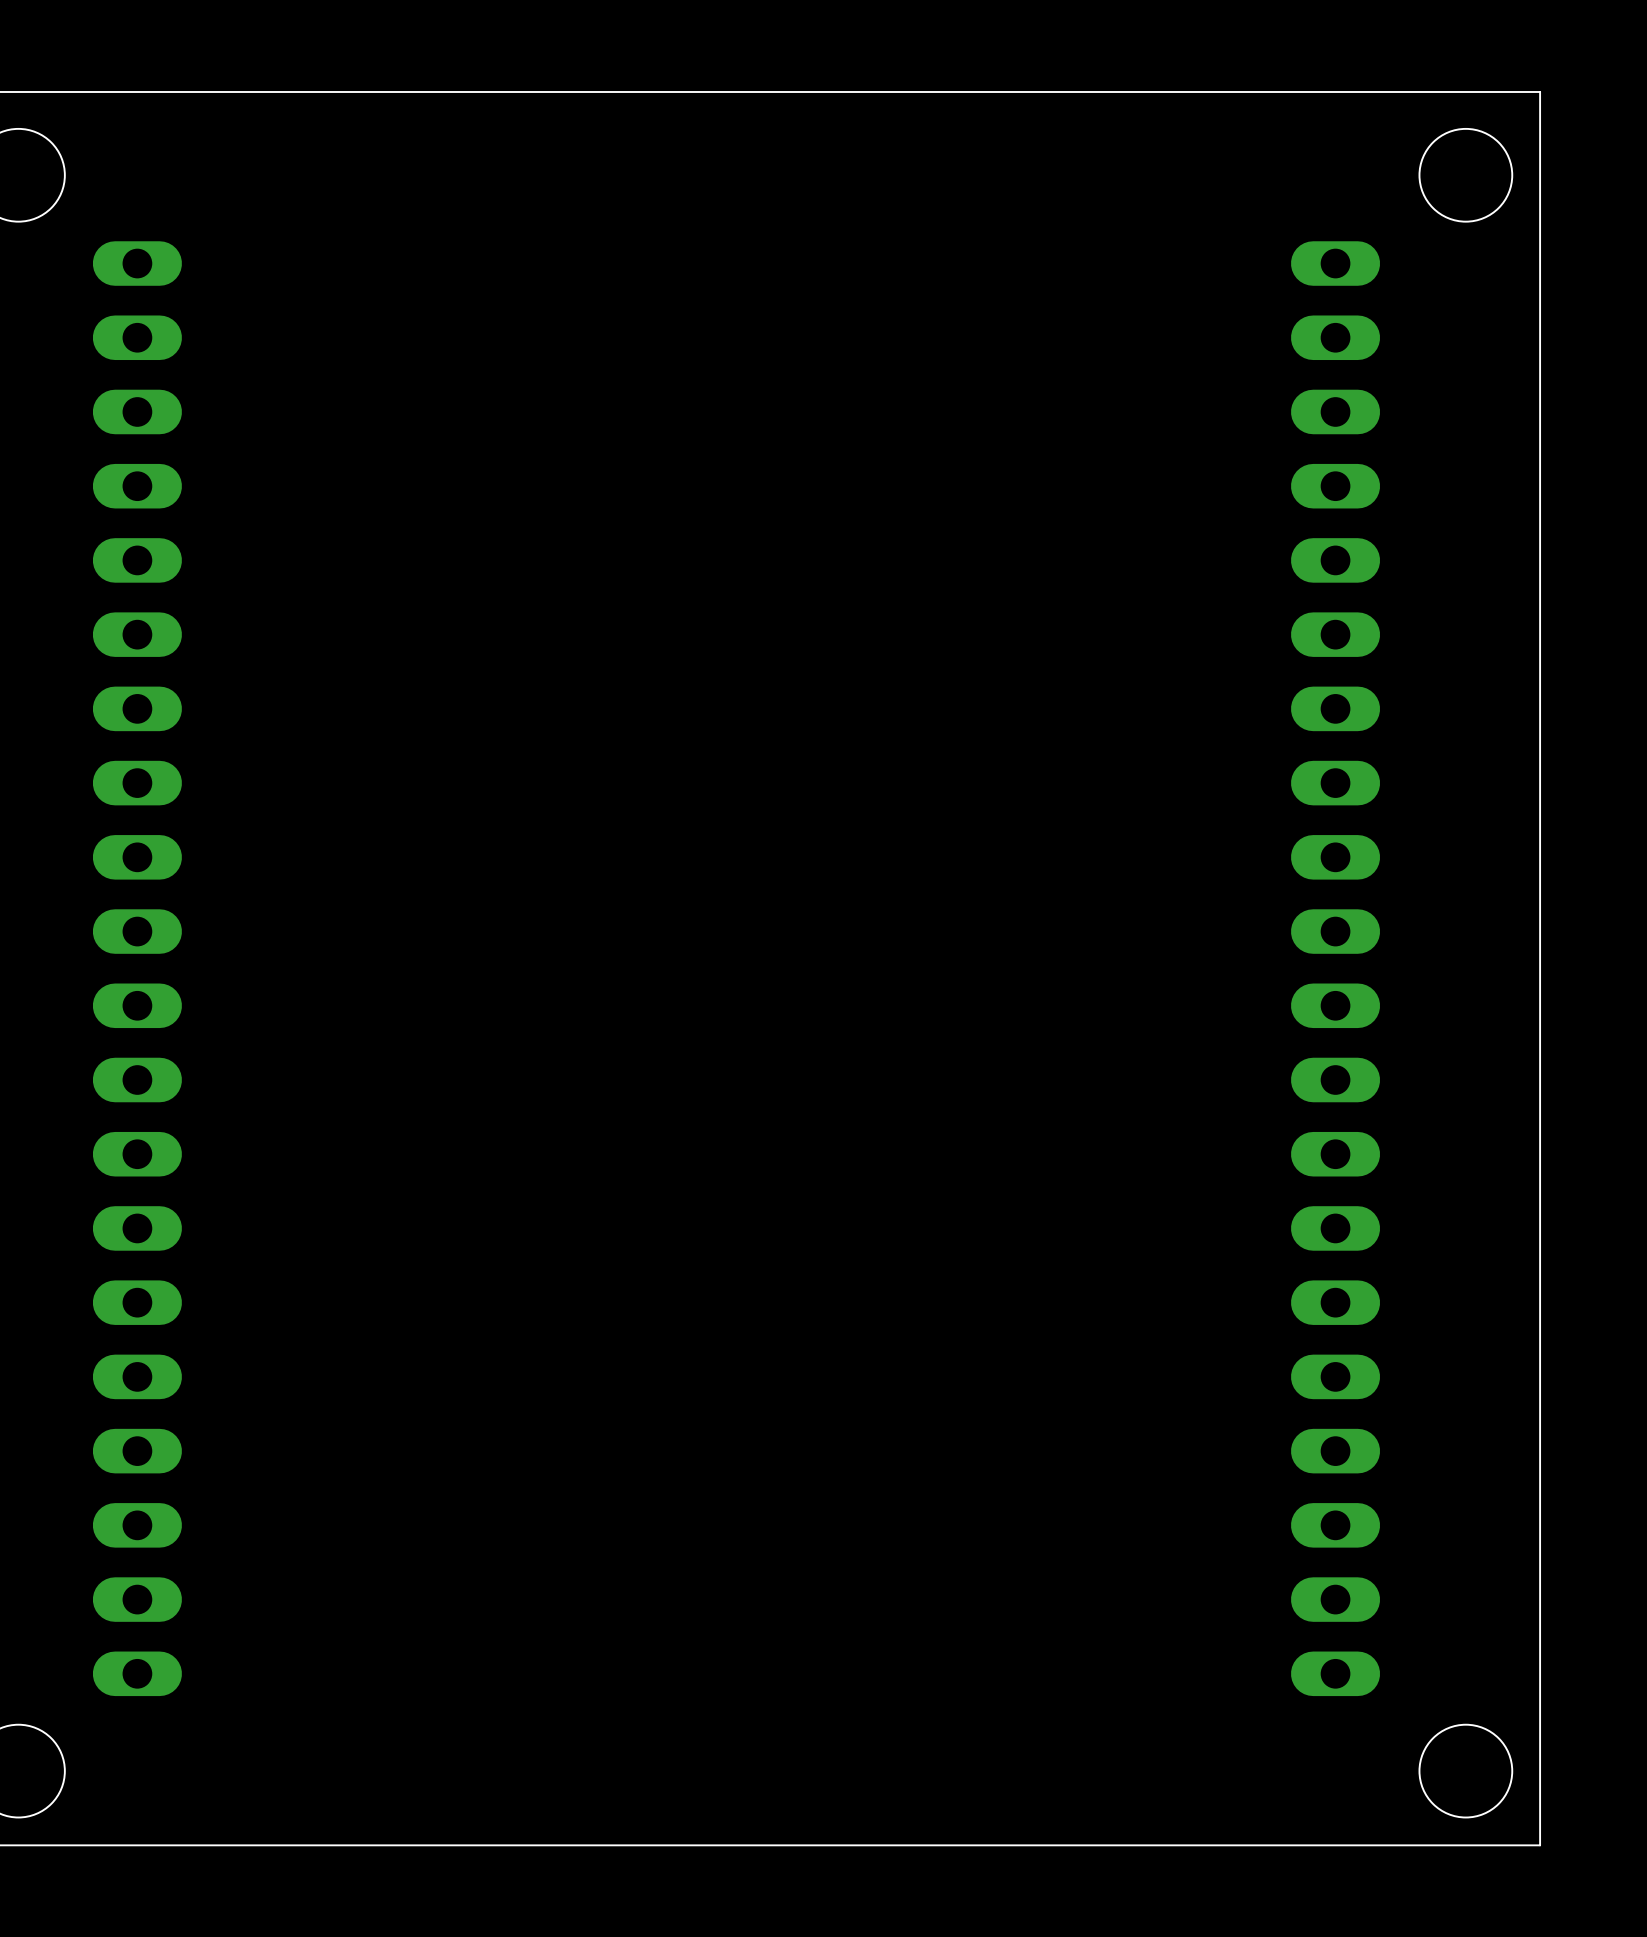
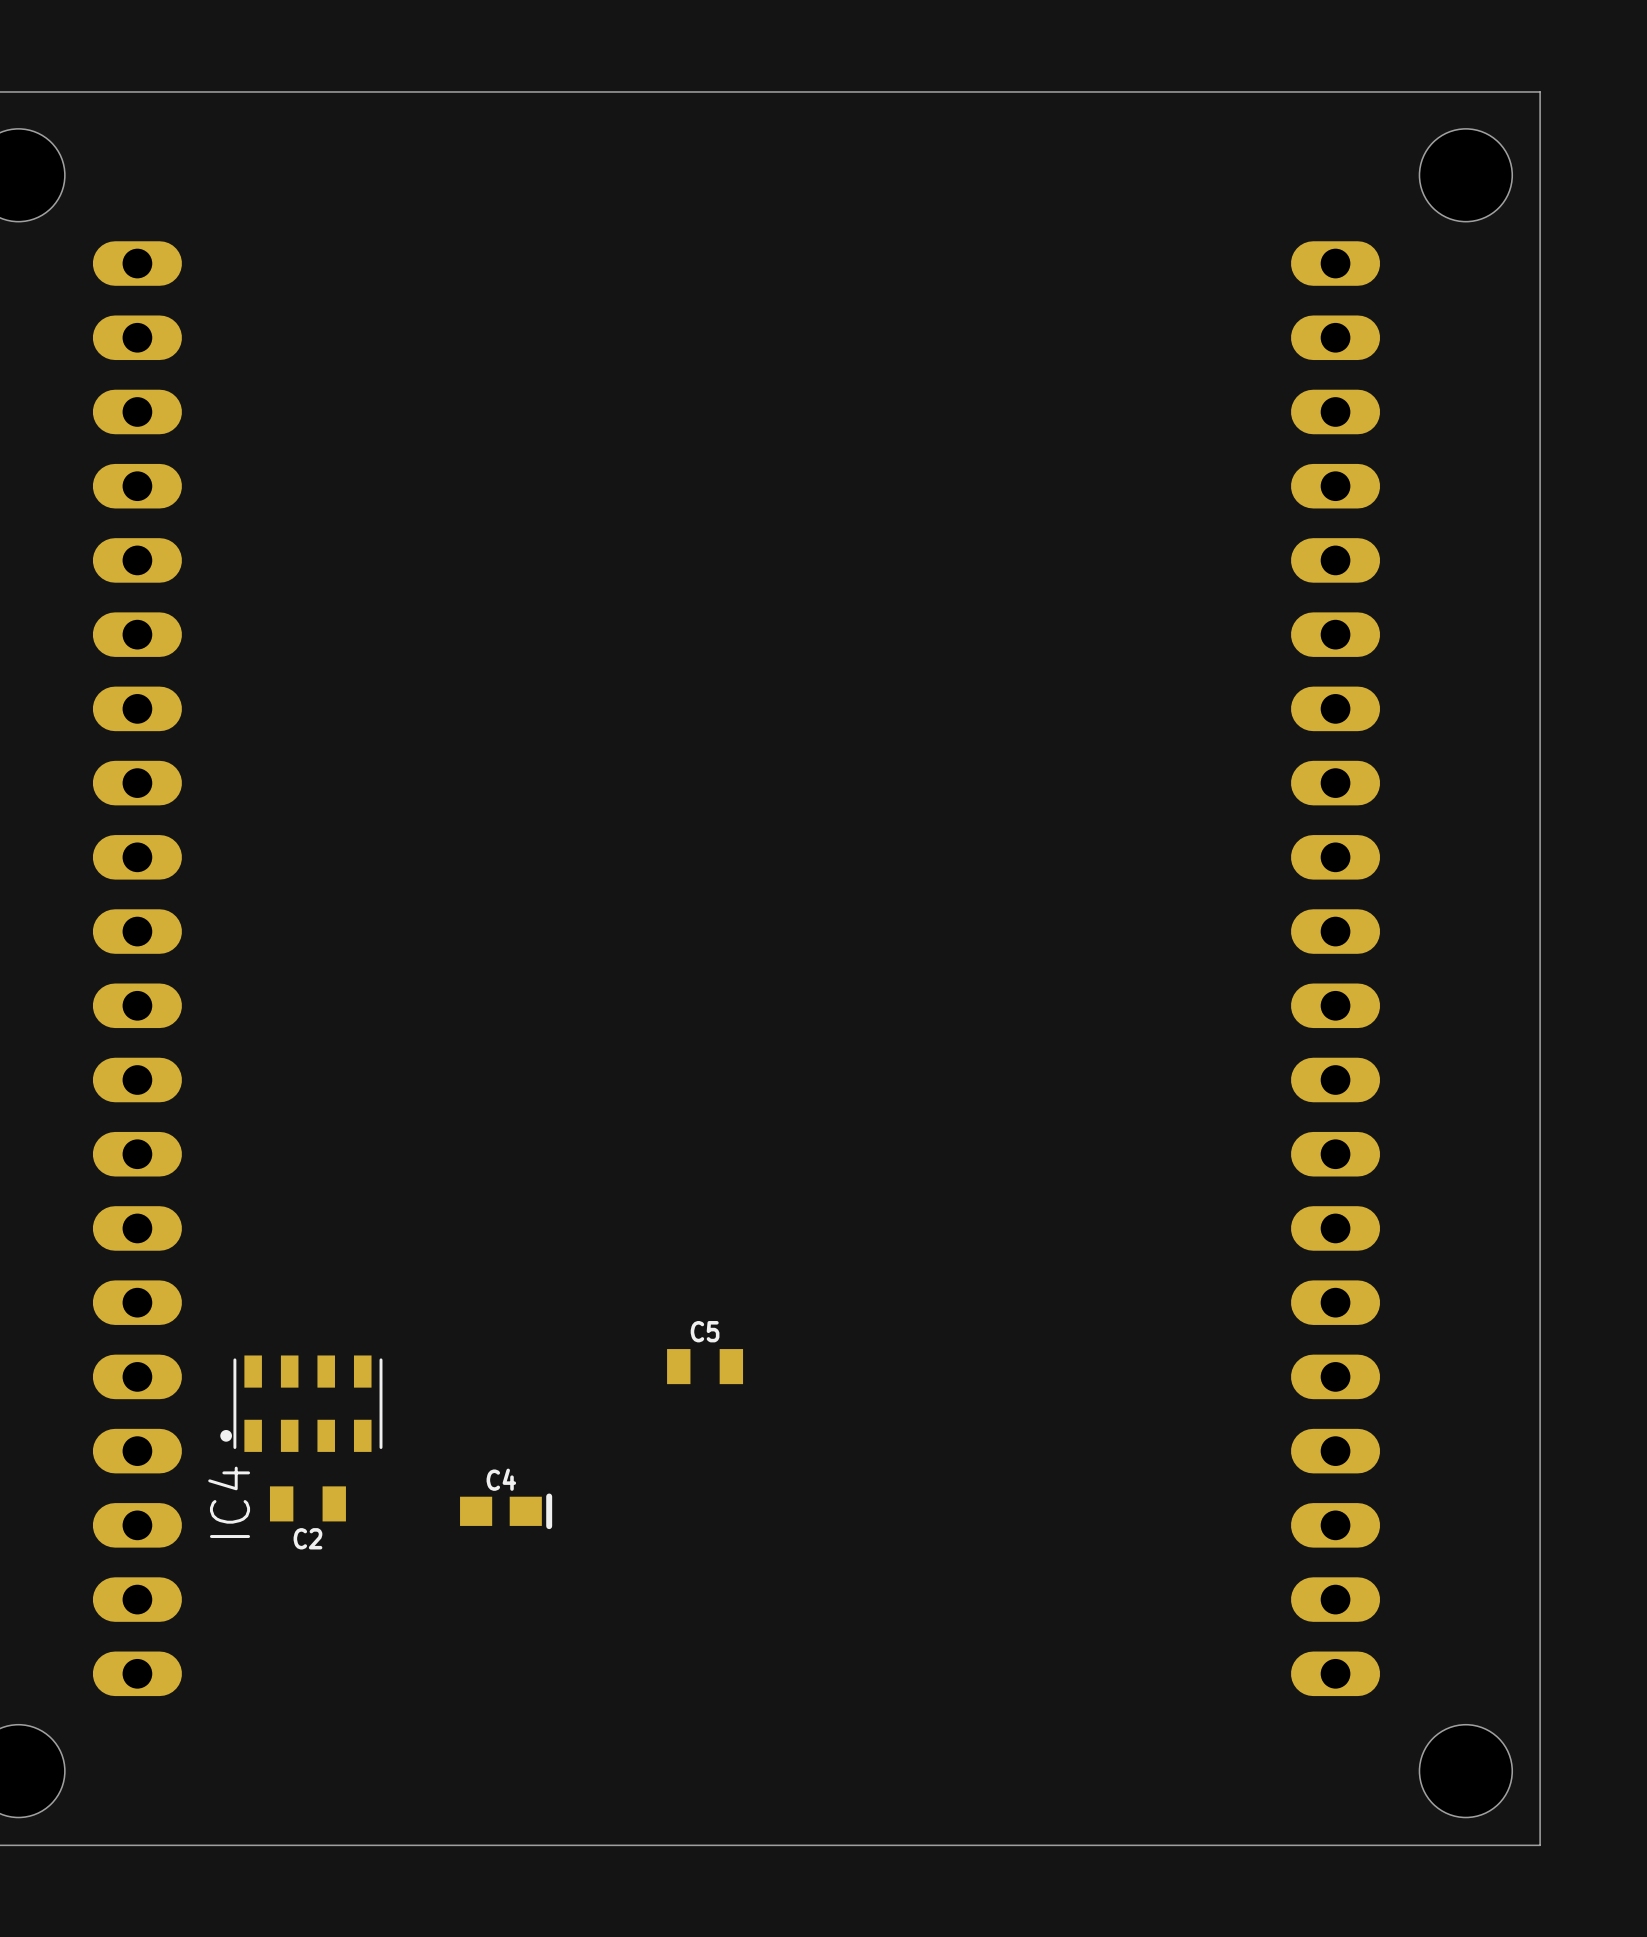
C5: none -> (705, 1366)
IC4: none -> (301, 1403)
C2: none -> (307, 1503)
C4: none -> (506, 1511)

